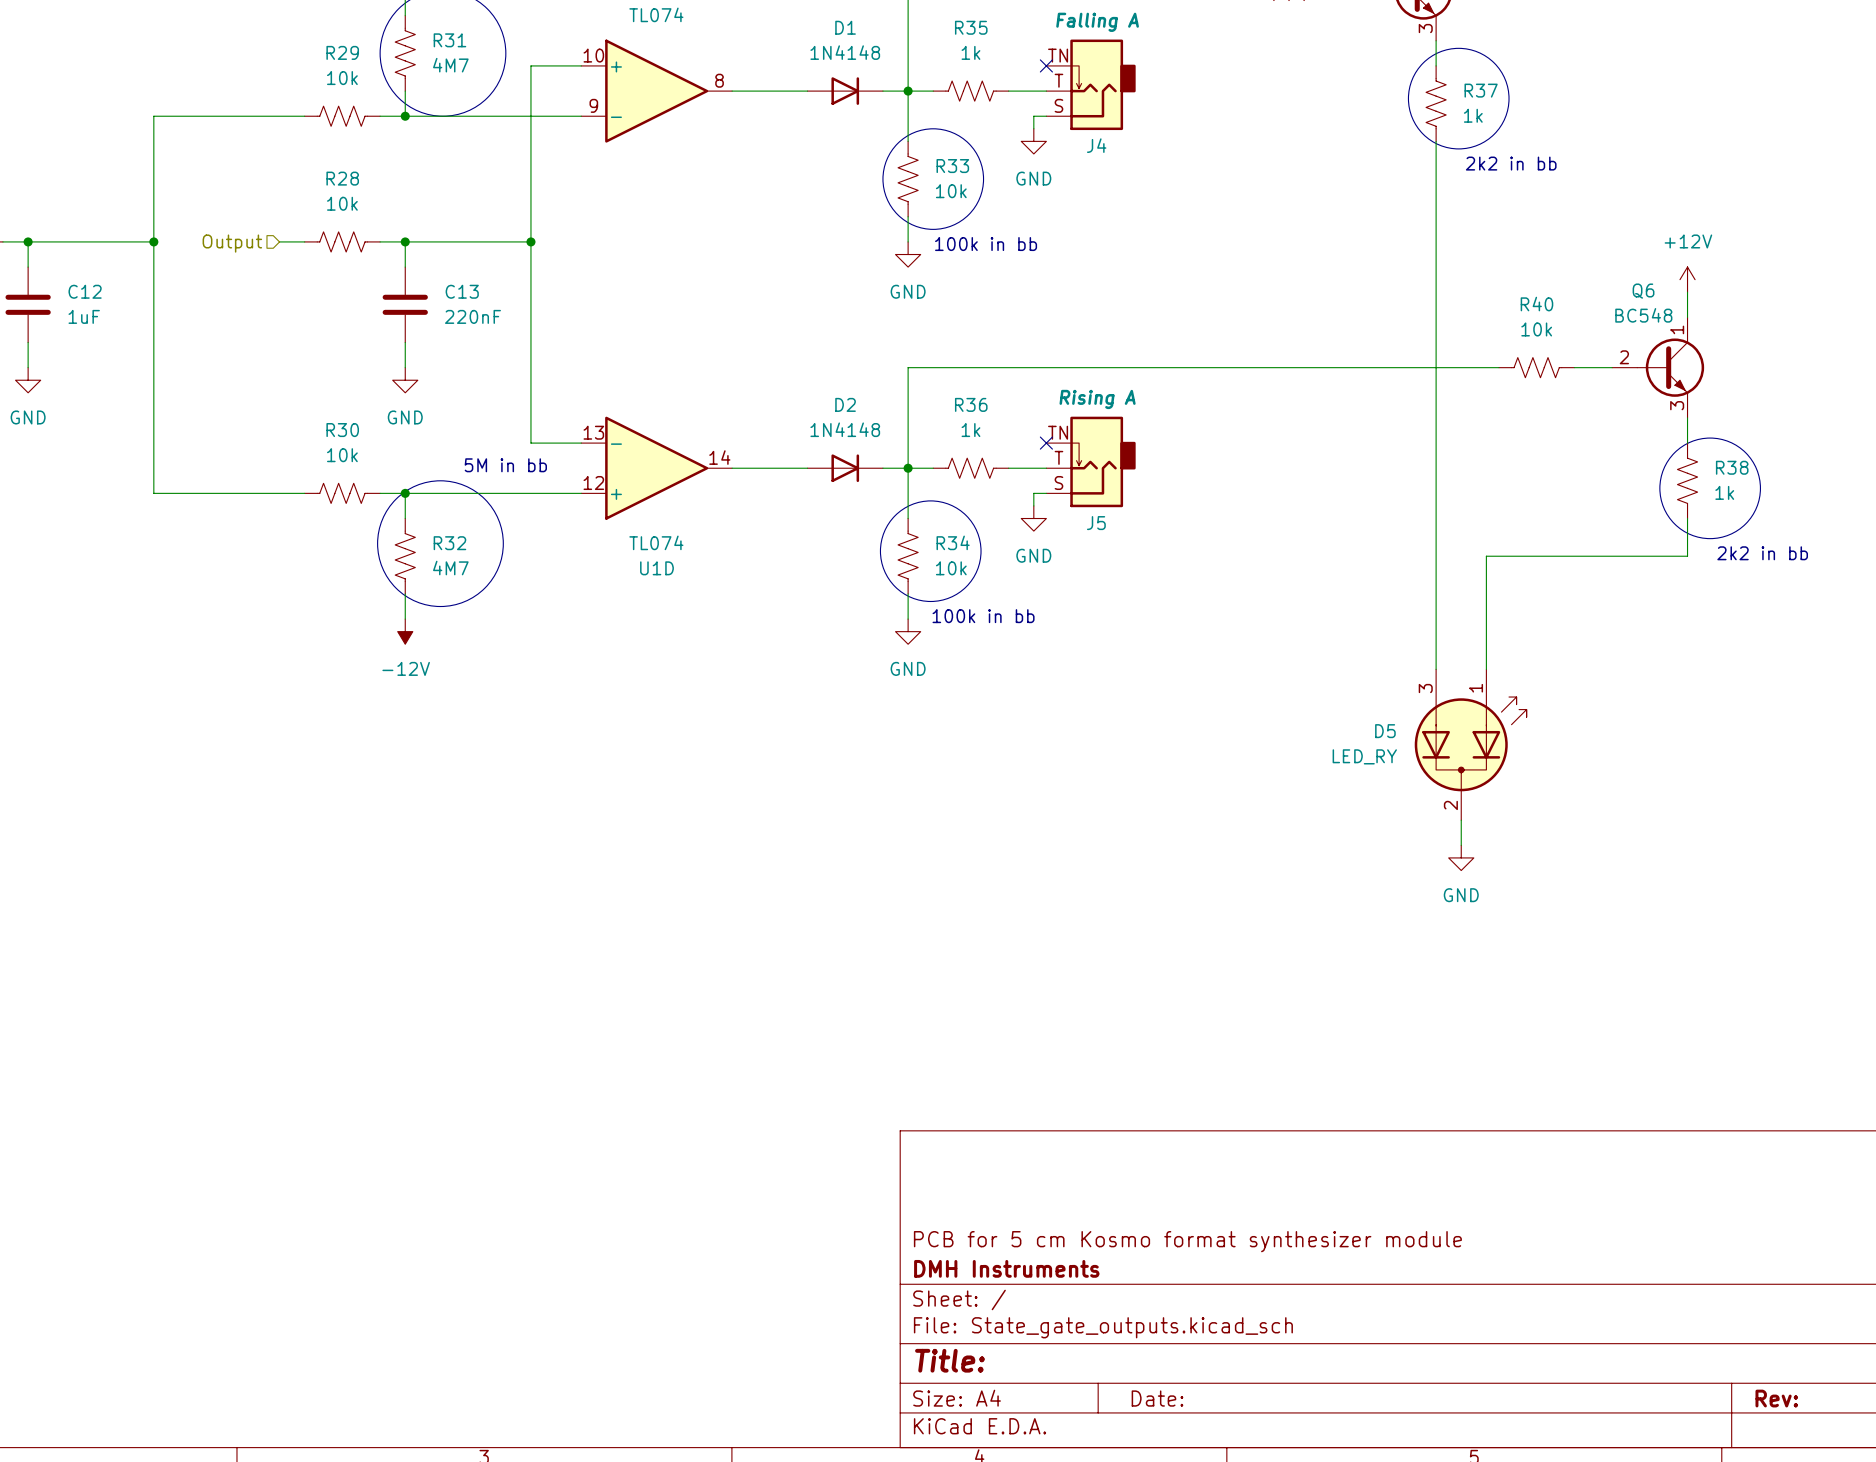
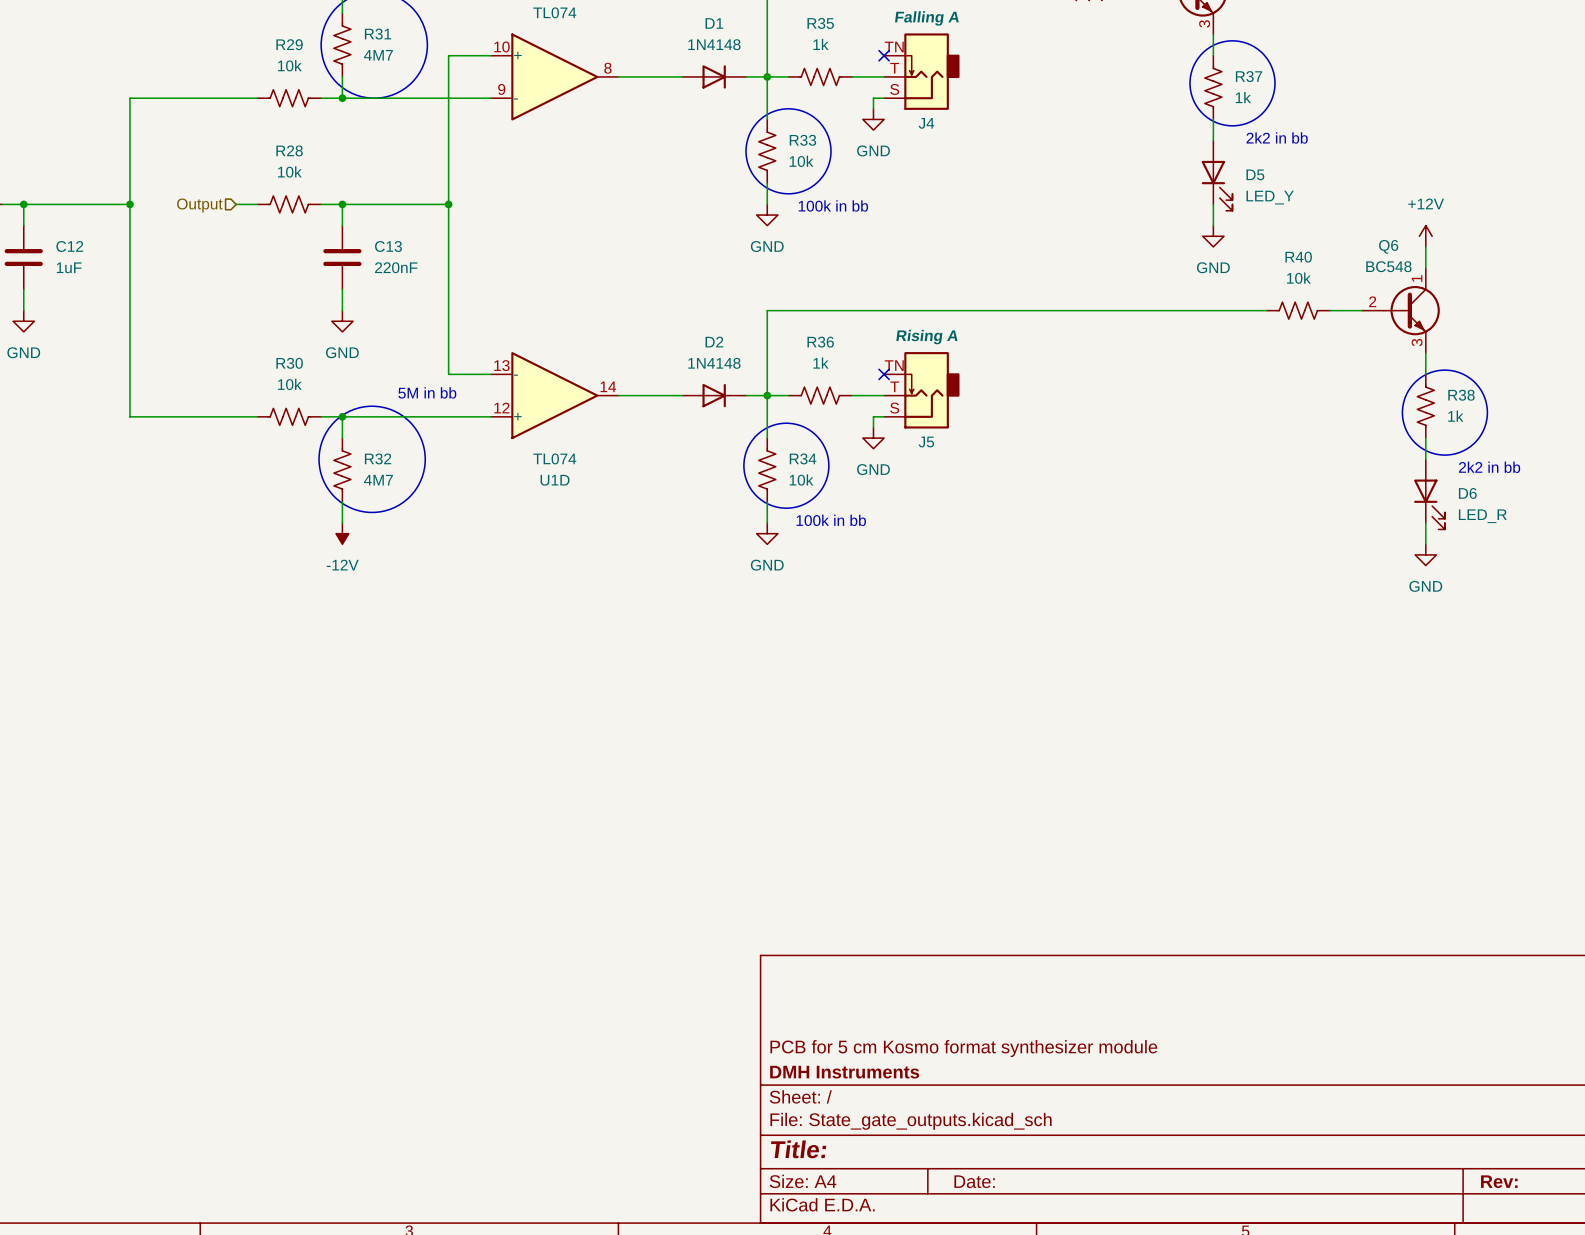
wire: (1436, 267) (1436, 669) -> none
power symbol: none -> GND (1213, 236)
wire: (1687, 543) (1687, 556) (1486, 556) (1486, 669) -> none
D6: none -> LED_R (1429, 494)
wire: none -> (1425, 523) (1425, 544)
power symbol: none -> GND (1425, 554)
D5 symbol: [1414, 669, 1527, 821] -> [1201, 140, 1233, 211]
D5 name position: D5 (1385, 731) -> D5 (1255, 174)
D5 value: LED_RY (1364, 756) -> LED_Y (1270, 197)
wire: (1461, 820) (1461, 845) -> none
power symbol: GND (1461, 857) -> none

